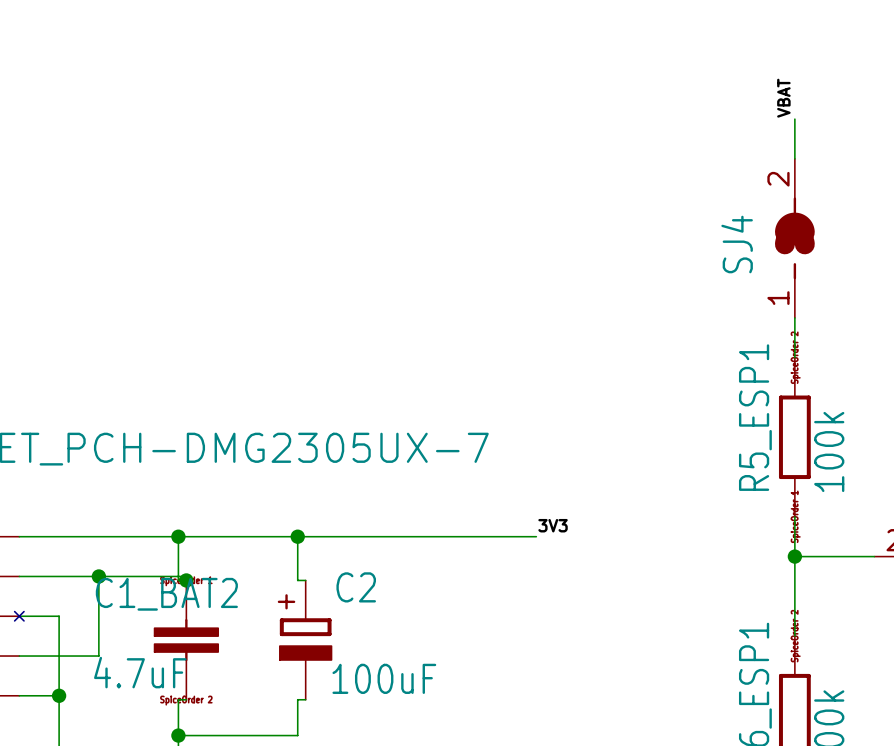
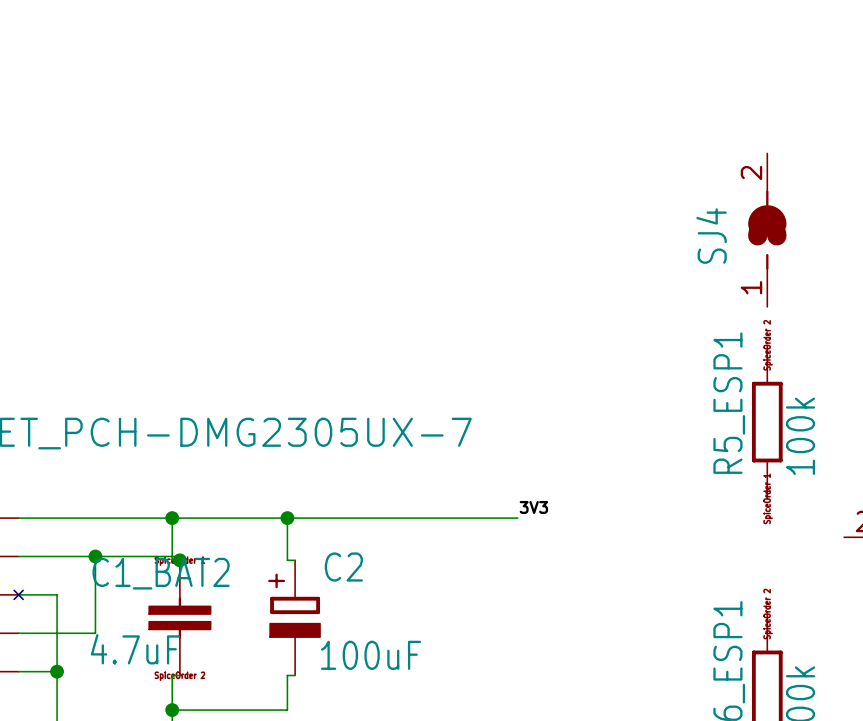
label: VBAT (783, 98) -> none
wire: (794, 119) (794, 158) -> none
wire: (794, 317) (794, 357) -> none
wire: (794, 516) (794, 636) -> none
wire: (794, 556) (874, 556) -> none
junction: (794, 556) -> none

